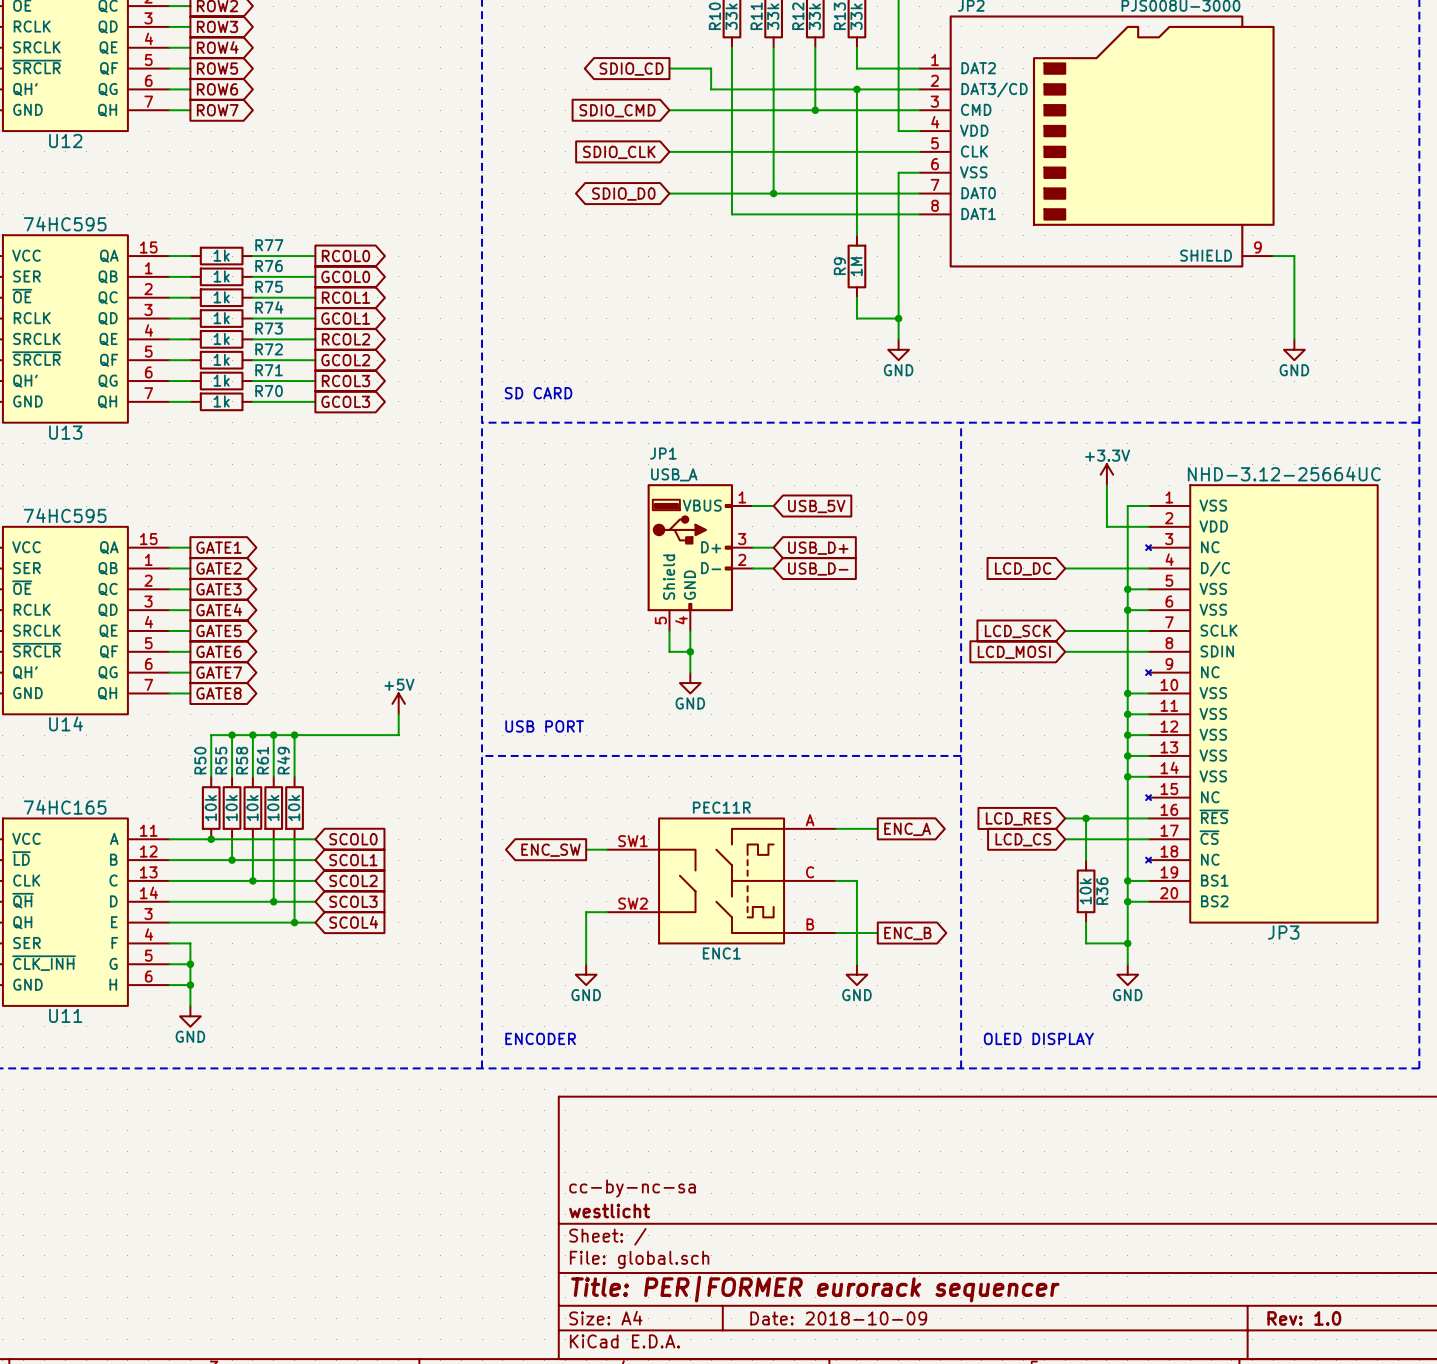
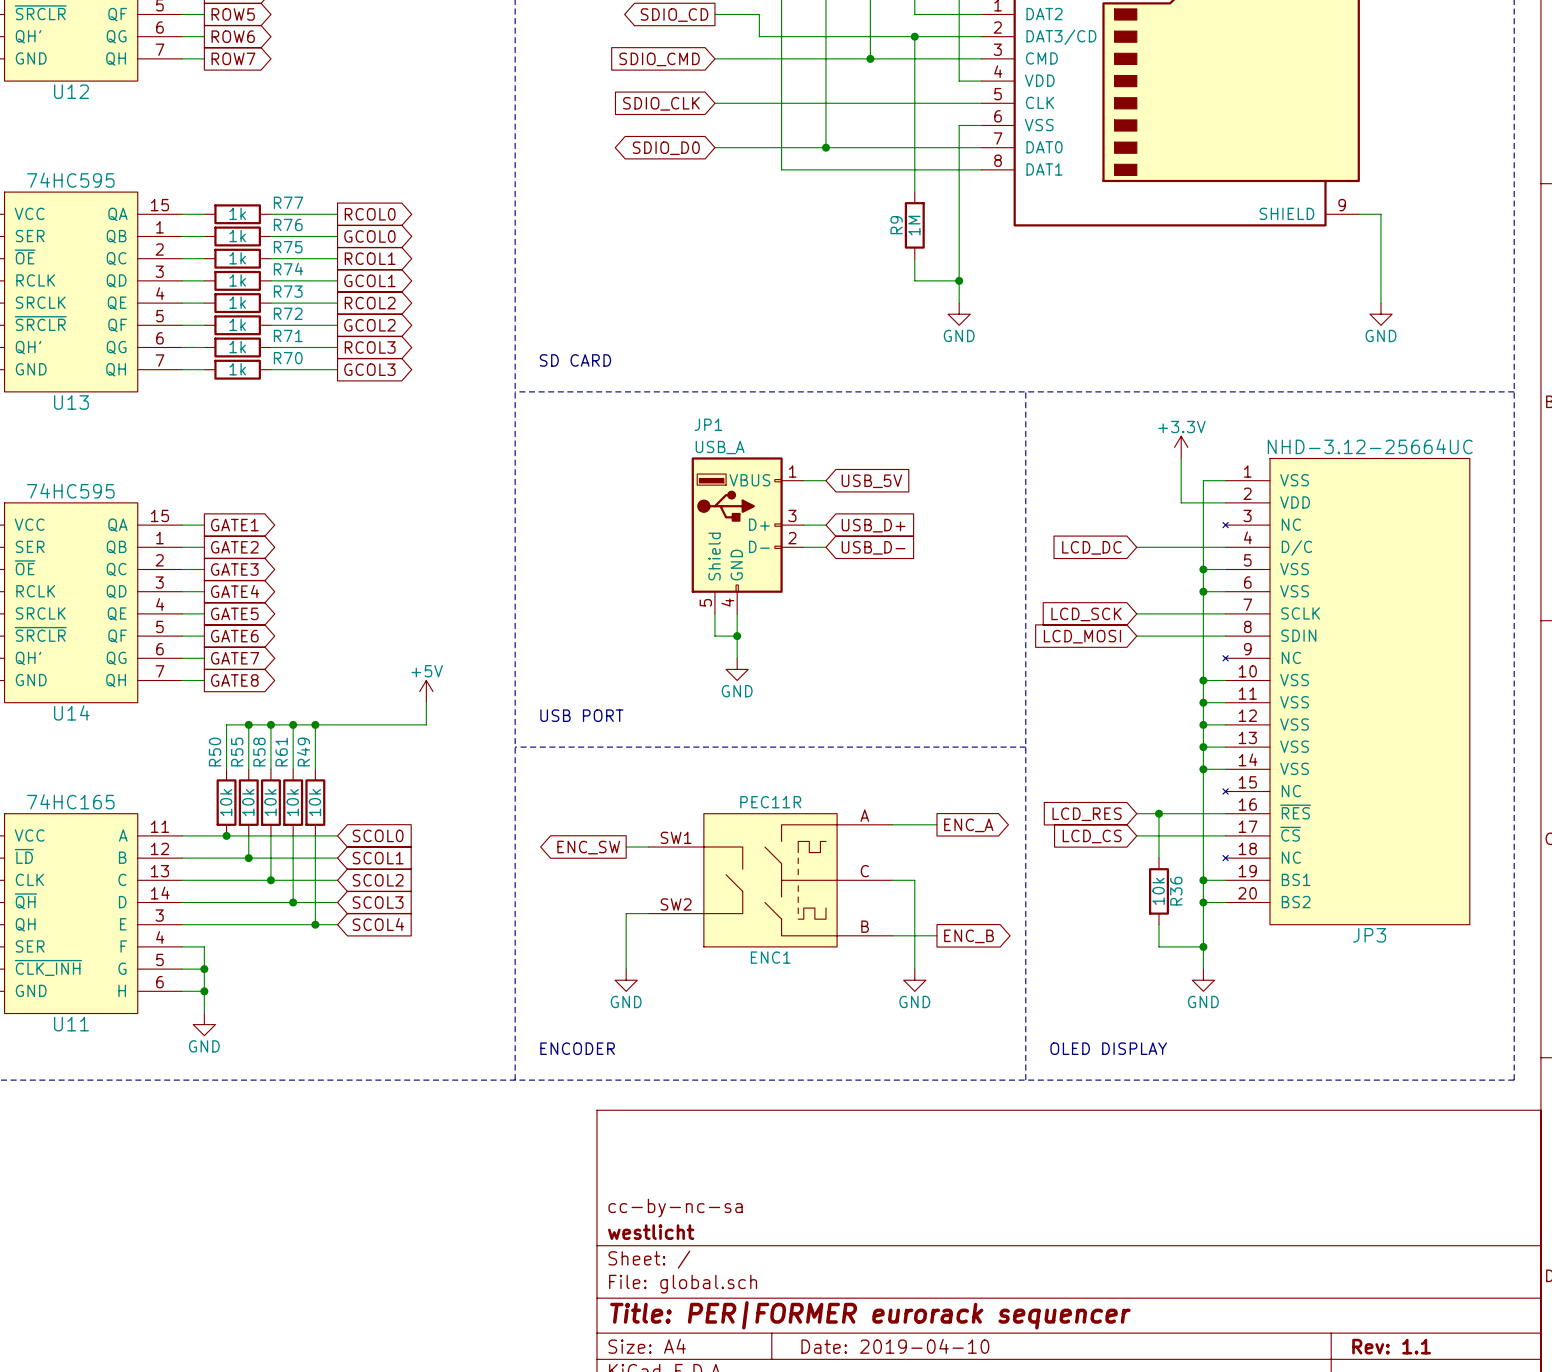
title block: Date: 2018-10-09 (838, 1318) -> Date: 2019-04-10 (895, 1346)
title block: Rev: 1.0 (1304, 1318) -> Rev: 1.1 (1391, 1346)

